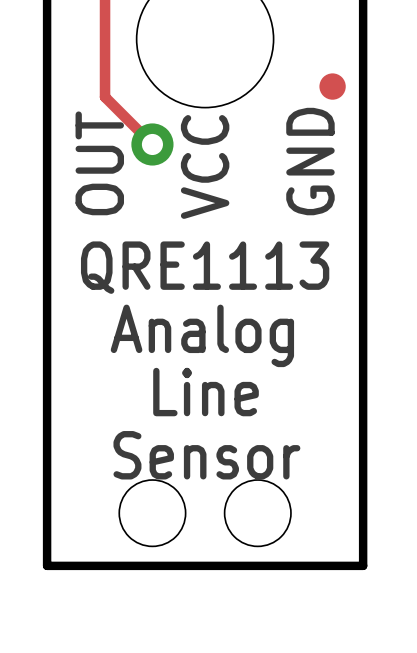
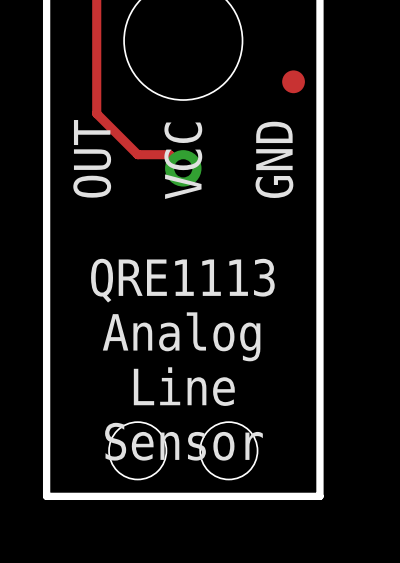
track: (105, 97) (152, 144) -> (96, 90) (96, 113) (137, 154) (169, 154) (183, 168)
via position: (152, 144) -> (183, 168)
text position: QRE1113 (205, 267) -> QRE1113 (182, 280)
text position: Analog (202, 335) -> Analog (181, 336)
text position: Line (206, 392) -> Line (184, 386)
text position: Sensor (206, 455) -> Sensor (183, 441)

